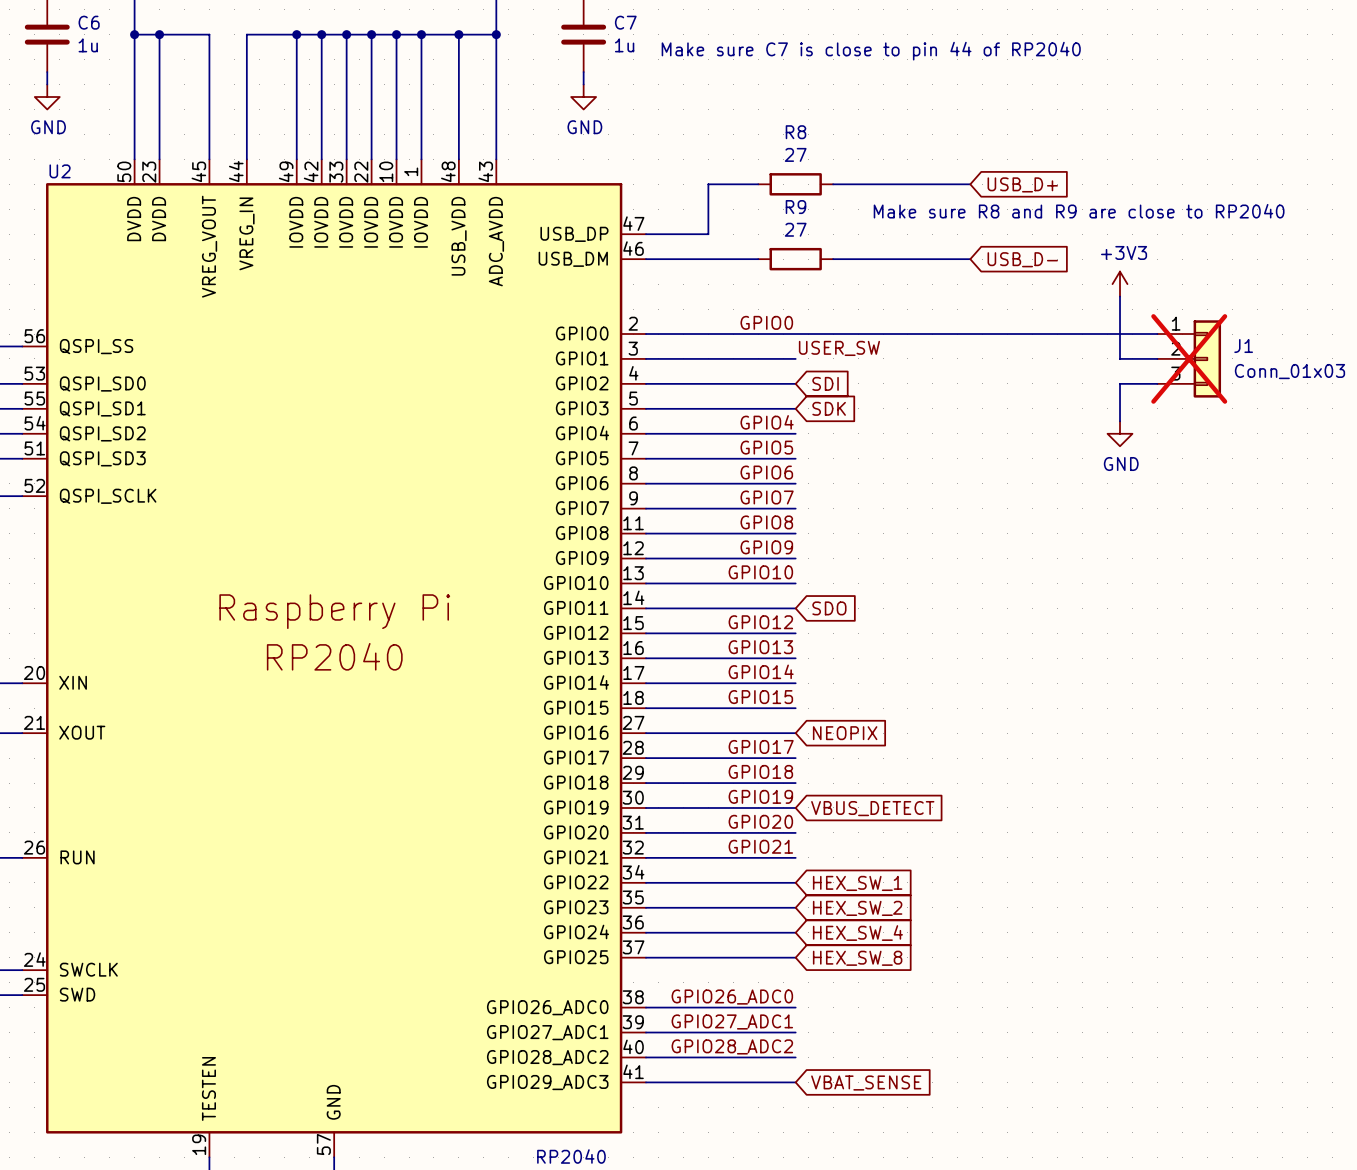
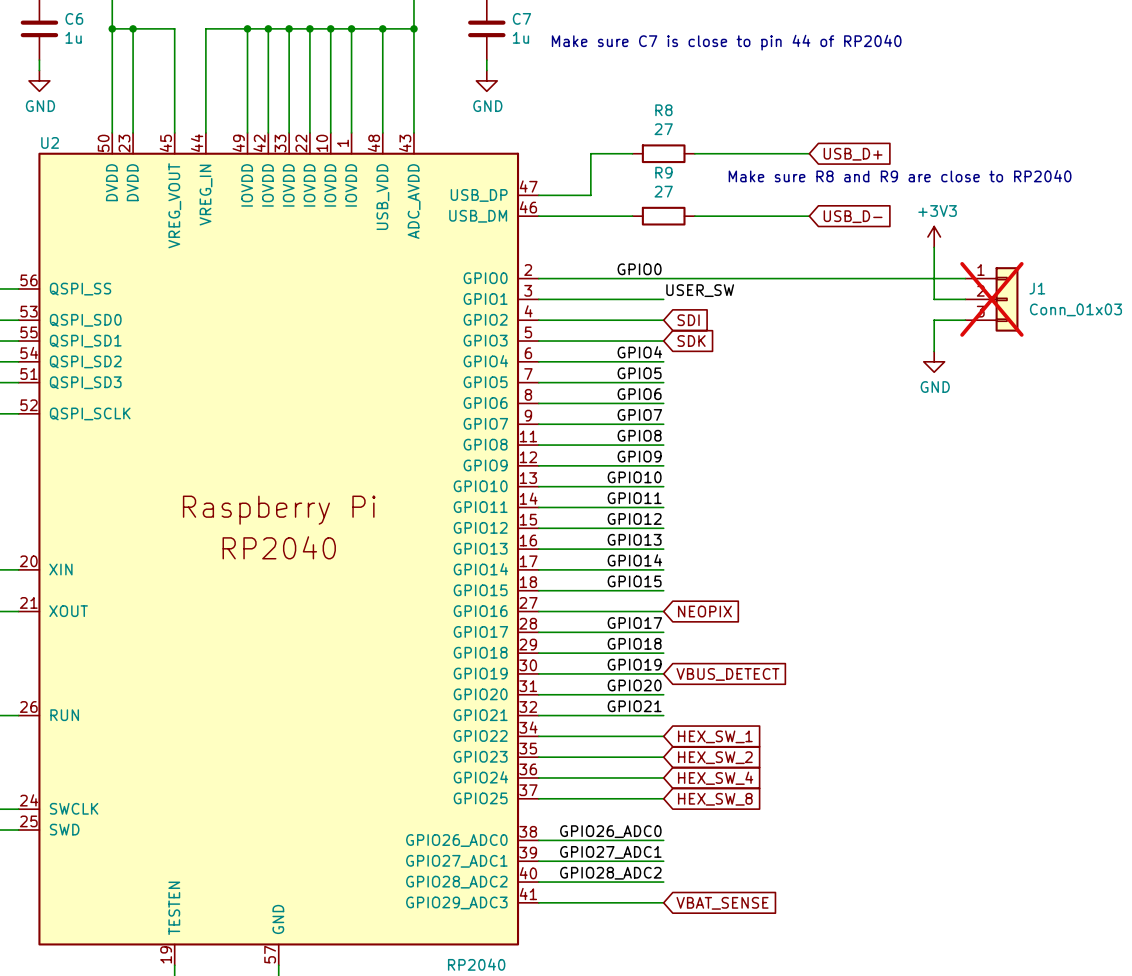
label: none -> GPIO11 (634, 498)
global label: SDO (829, 608) -> none

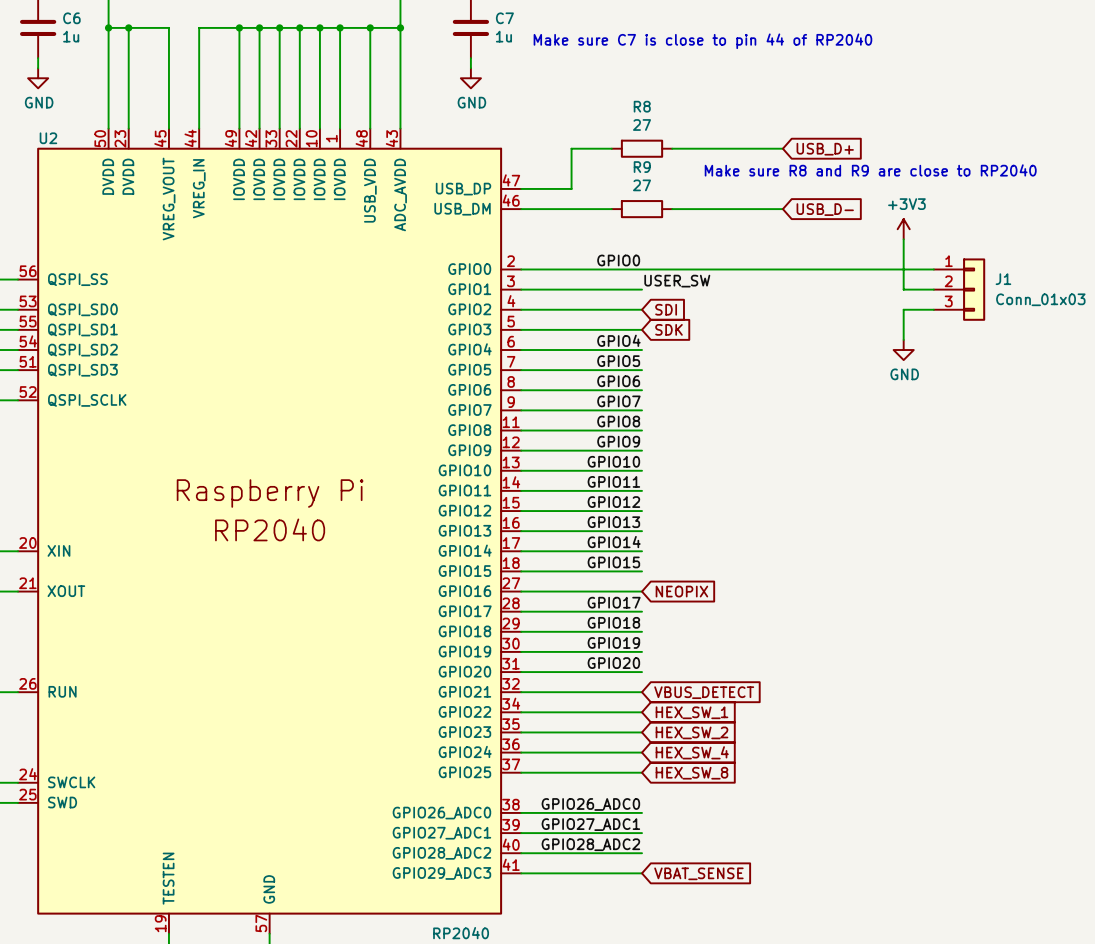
J1 do-not-place cross: (991, 299) -> none
global label position: VBUS_DETECT (727, 674) -> VBUS_DETECT (704, 692)
label: GPIO21 (634, 706) -> none

